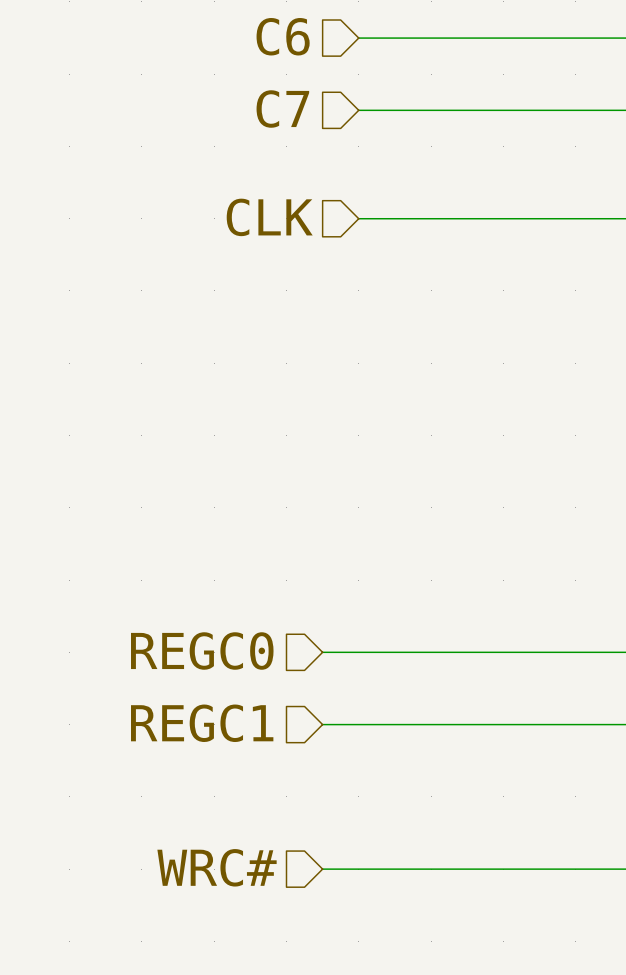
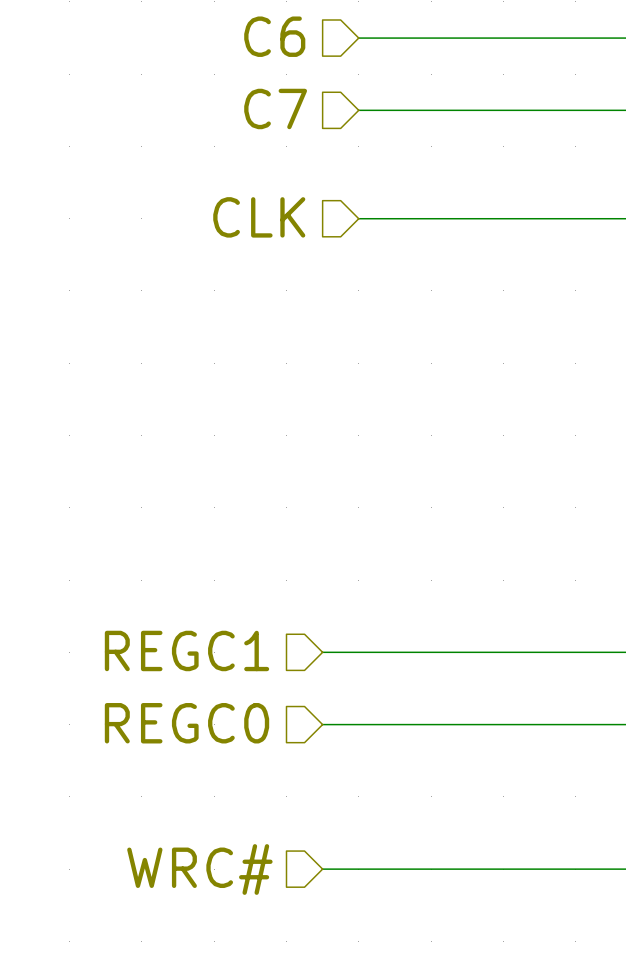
hierarchical label: REGC0 (202, 651) -> REGC1 (186, 650)
hierarchical label: REGC1 (202, 723) -> REGC0 (186, 723)

